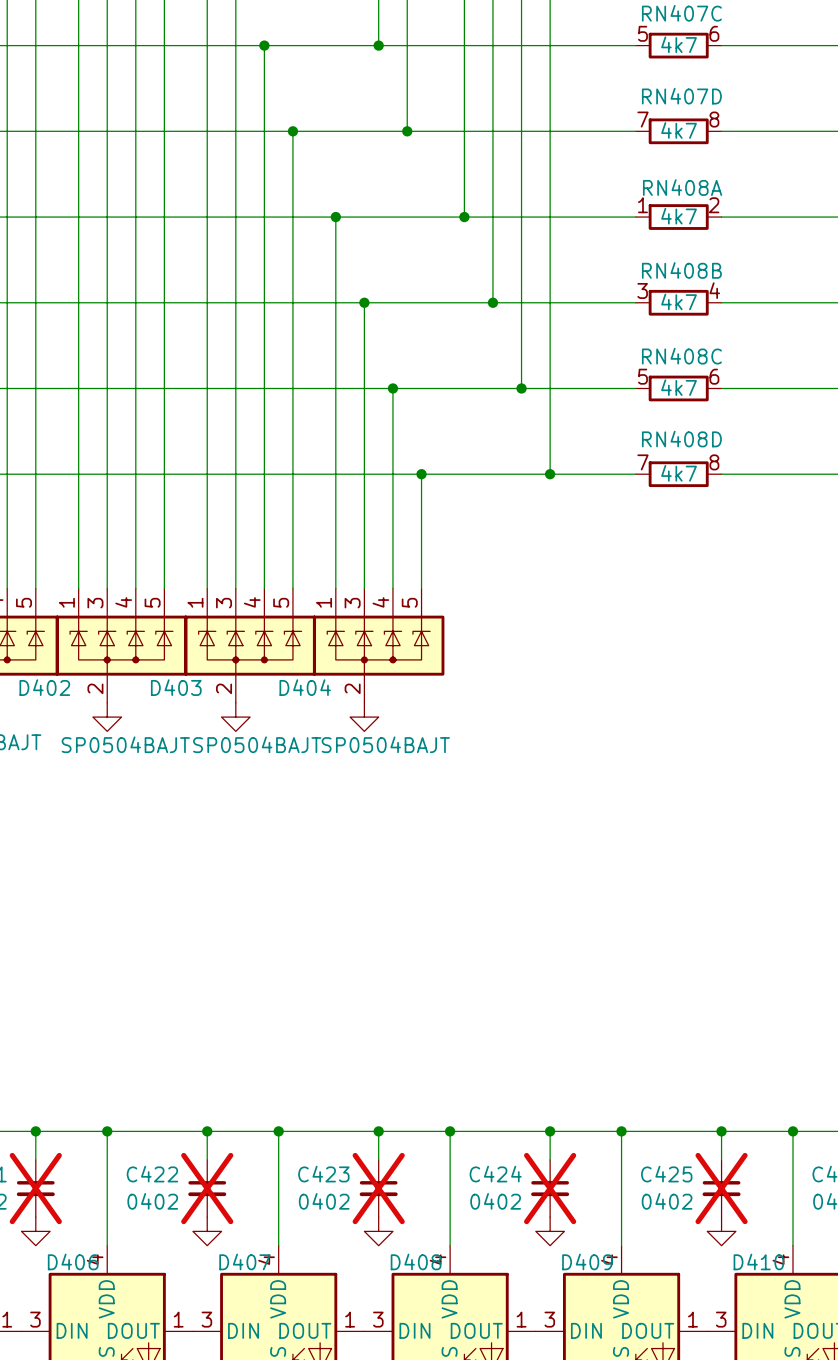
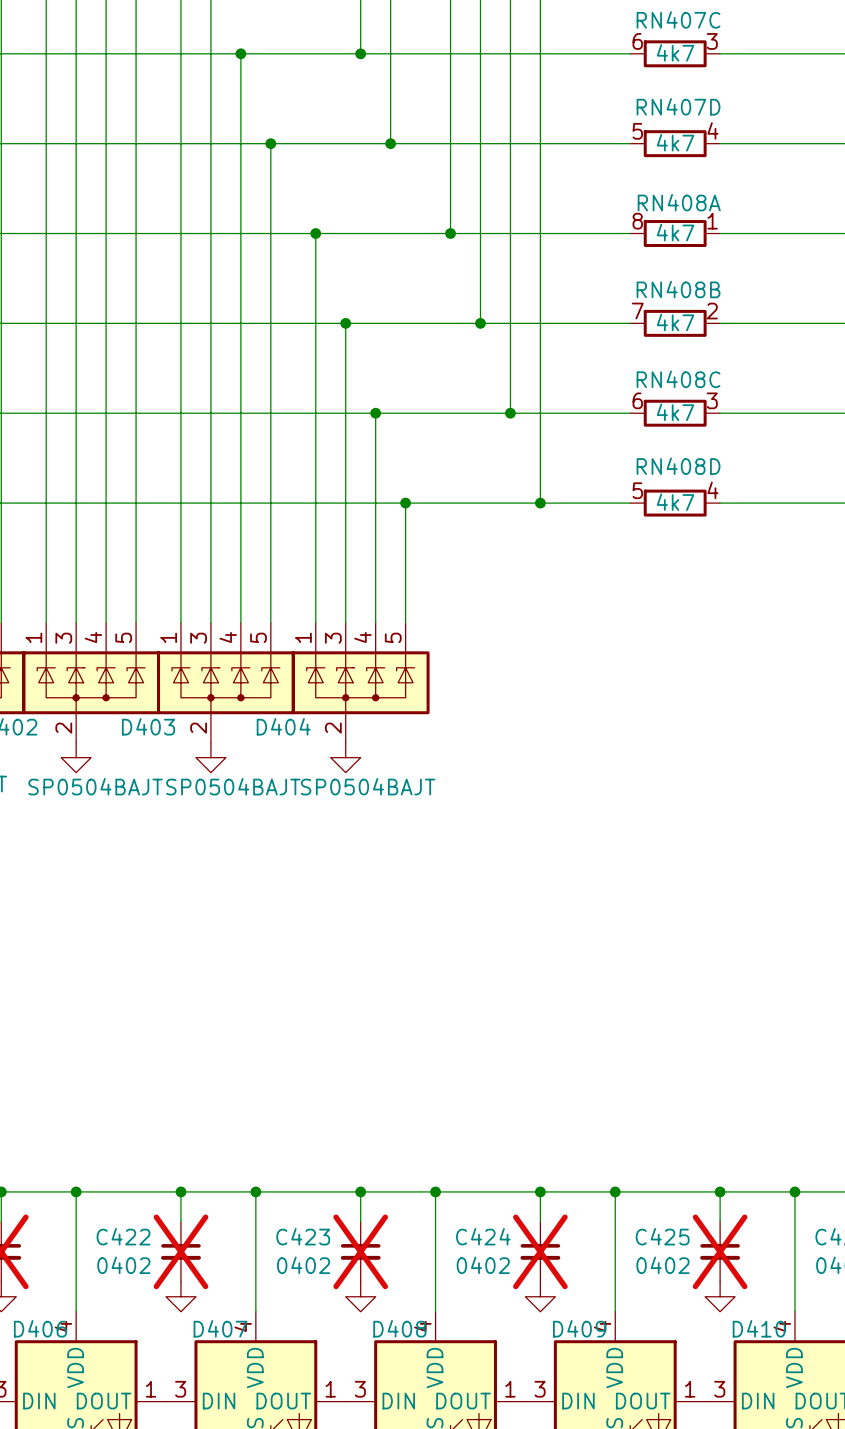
RN407C pin number: 5 (642, 33) -> 6 (637, 41)
RN407C pin number: 6 (714, 33) -> 3 (712, 41)
RN407D pin number: 7 (642, 119) -> 5 (637, 131)
RN407D pin number: 8 (714, 119) -> 4 (712, 130)
RN408A pin number: 1 (642, 205) -> 8 (637, 221)
RN408A pin number: 2 (714, 205) -> 1 (712, 221)
RN408B pin number: 3 (642, 290) -> 7 (637, 311)
RN408B pin number: 4 (714, 290) -> 2 (712, 311)
RN408C pin number: 5 (642, 376) -> 6 (637, 400)
RN408C pin number: 6 (714, 376) -> 3 (712, 400)
RN408D pin number: 7 (642, 462) -> 5 (637, 490)
RN408D pin number: 8 (714, 462) -> 4 (712, 490)

